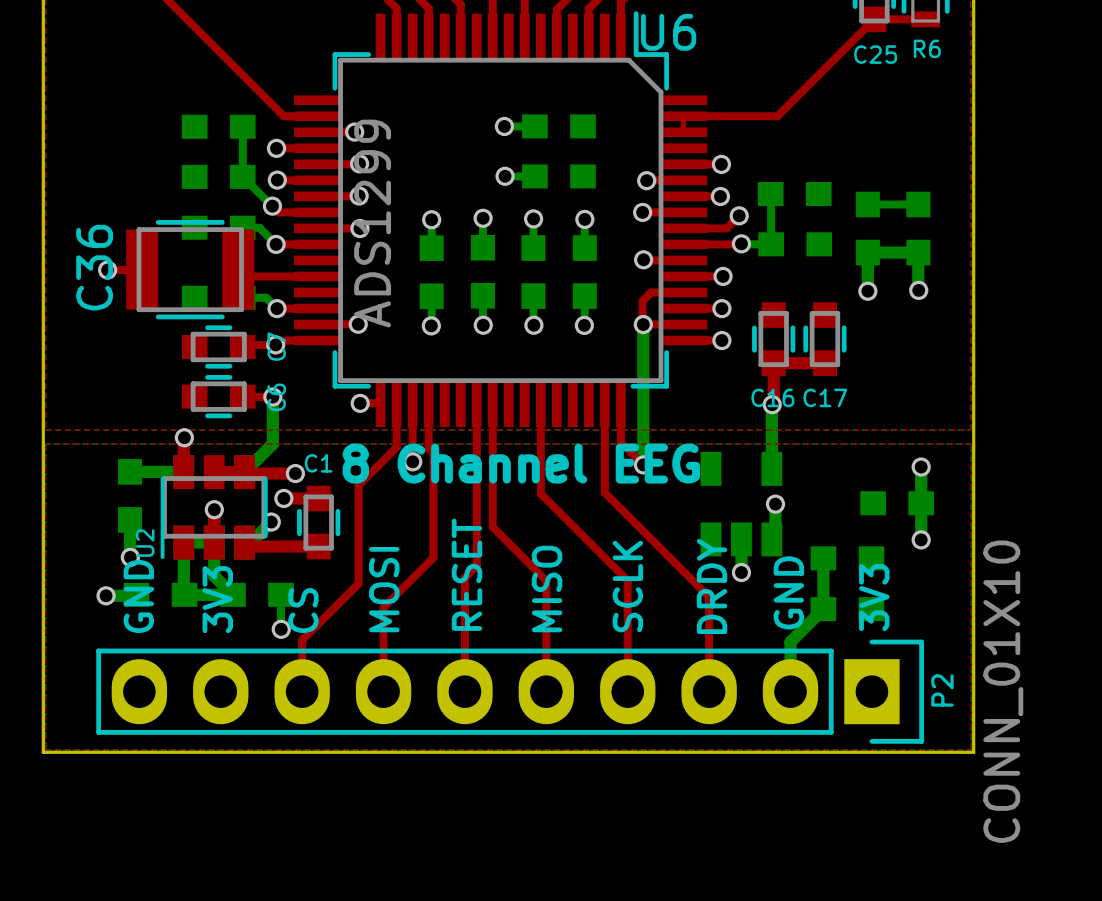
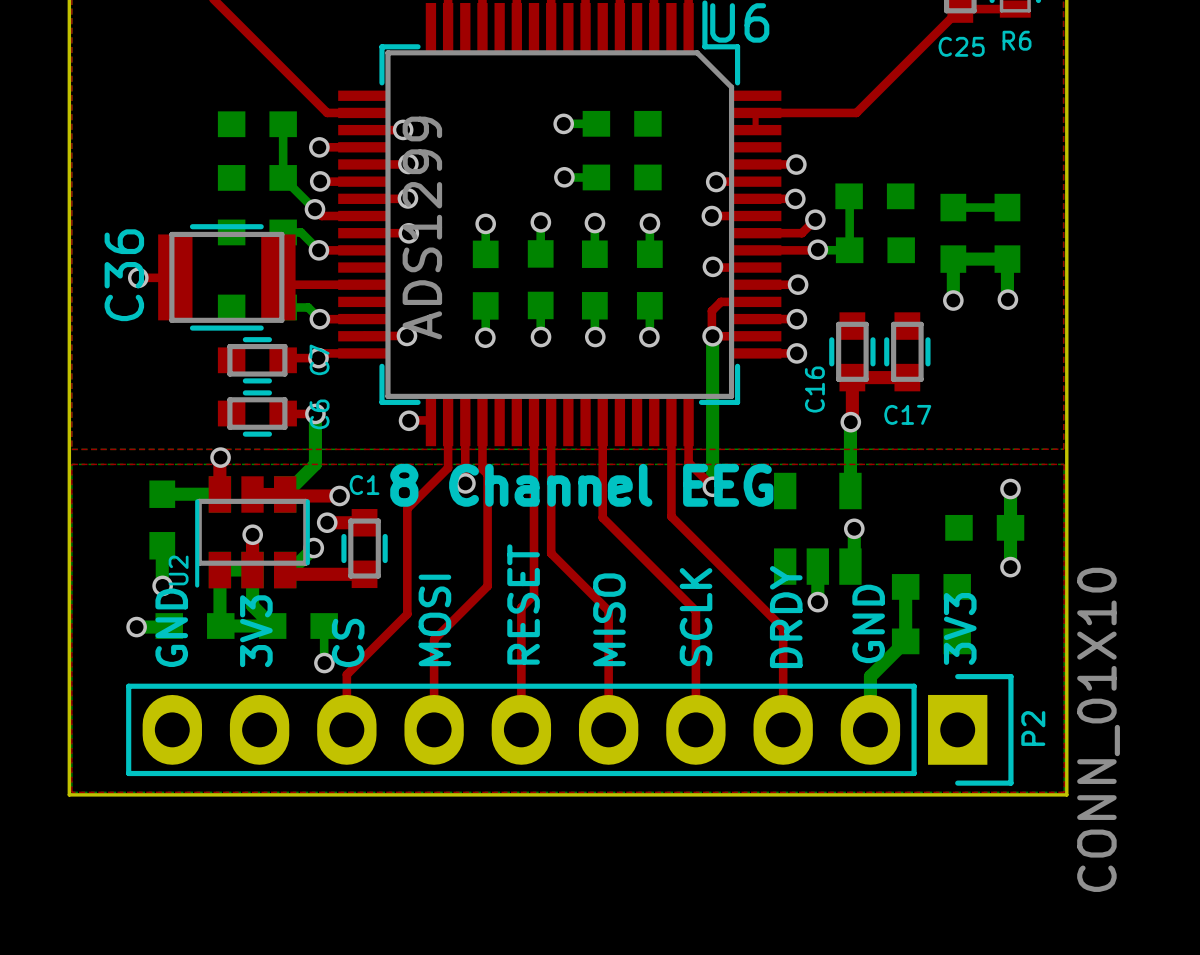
C16 name rotation: 0° (772, 397) -> 90° counterclockwise (814, 389)

